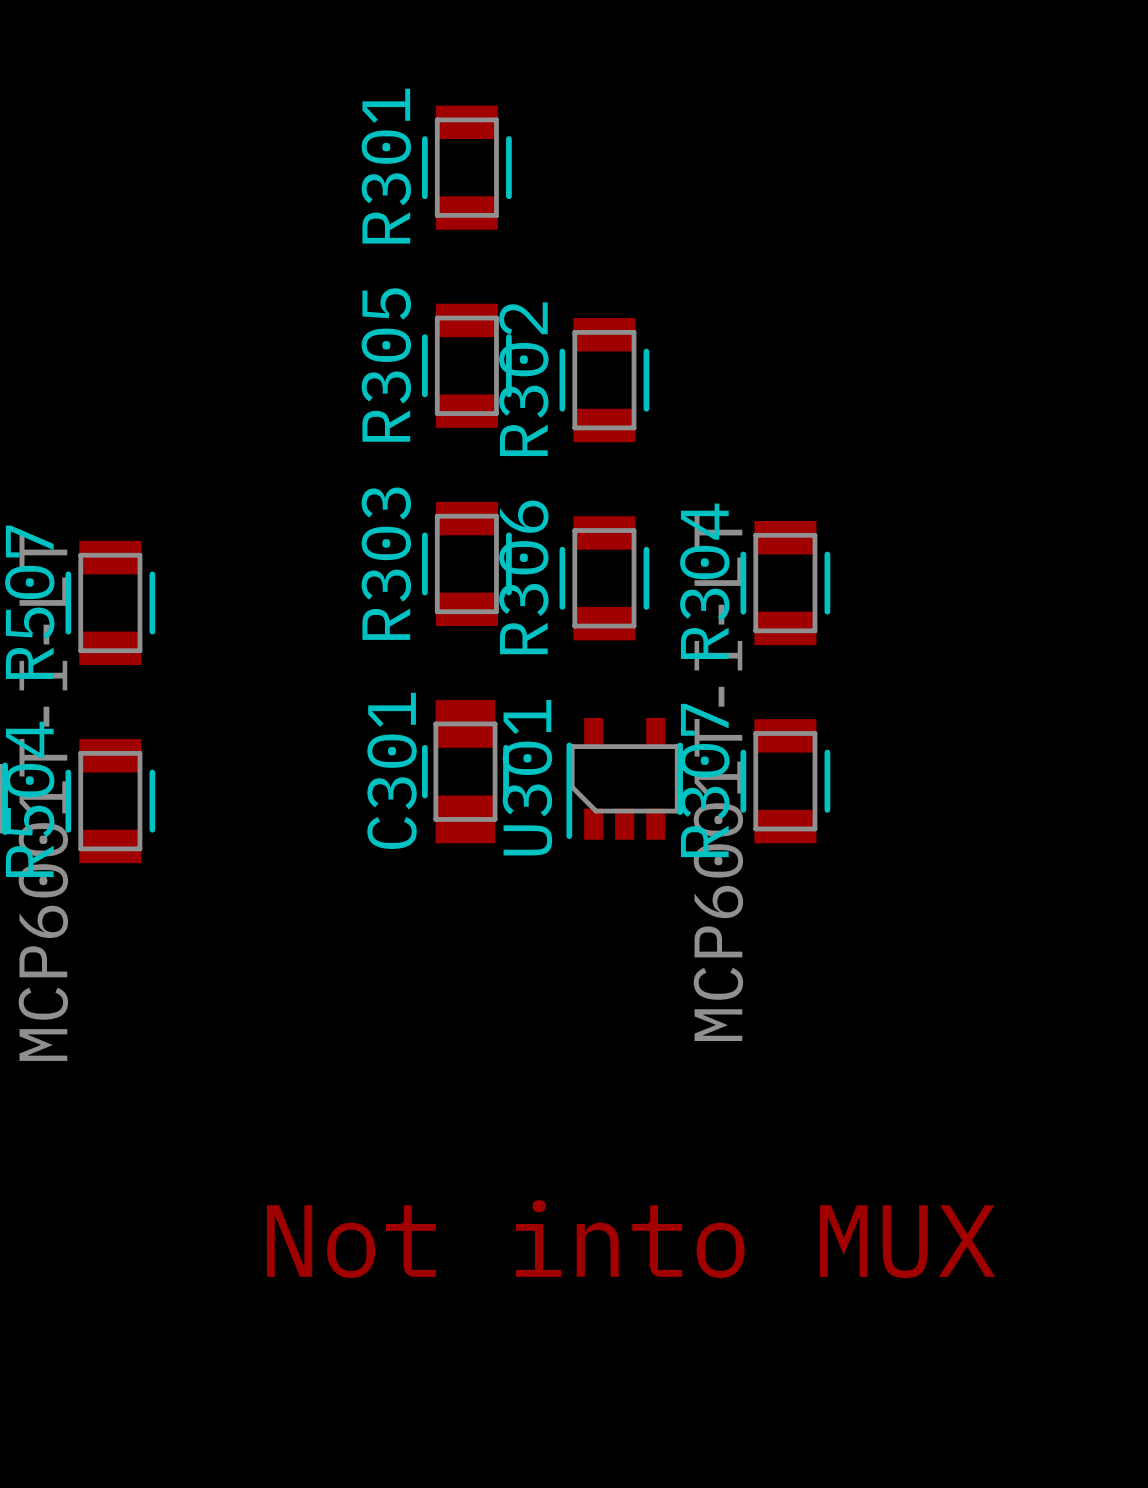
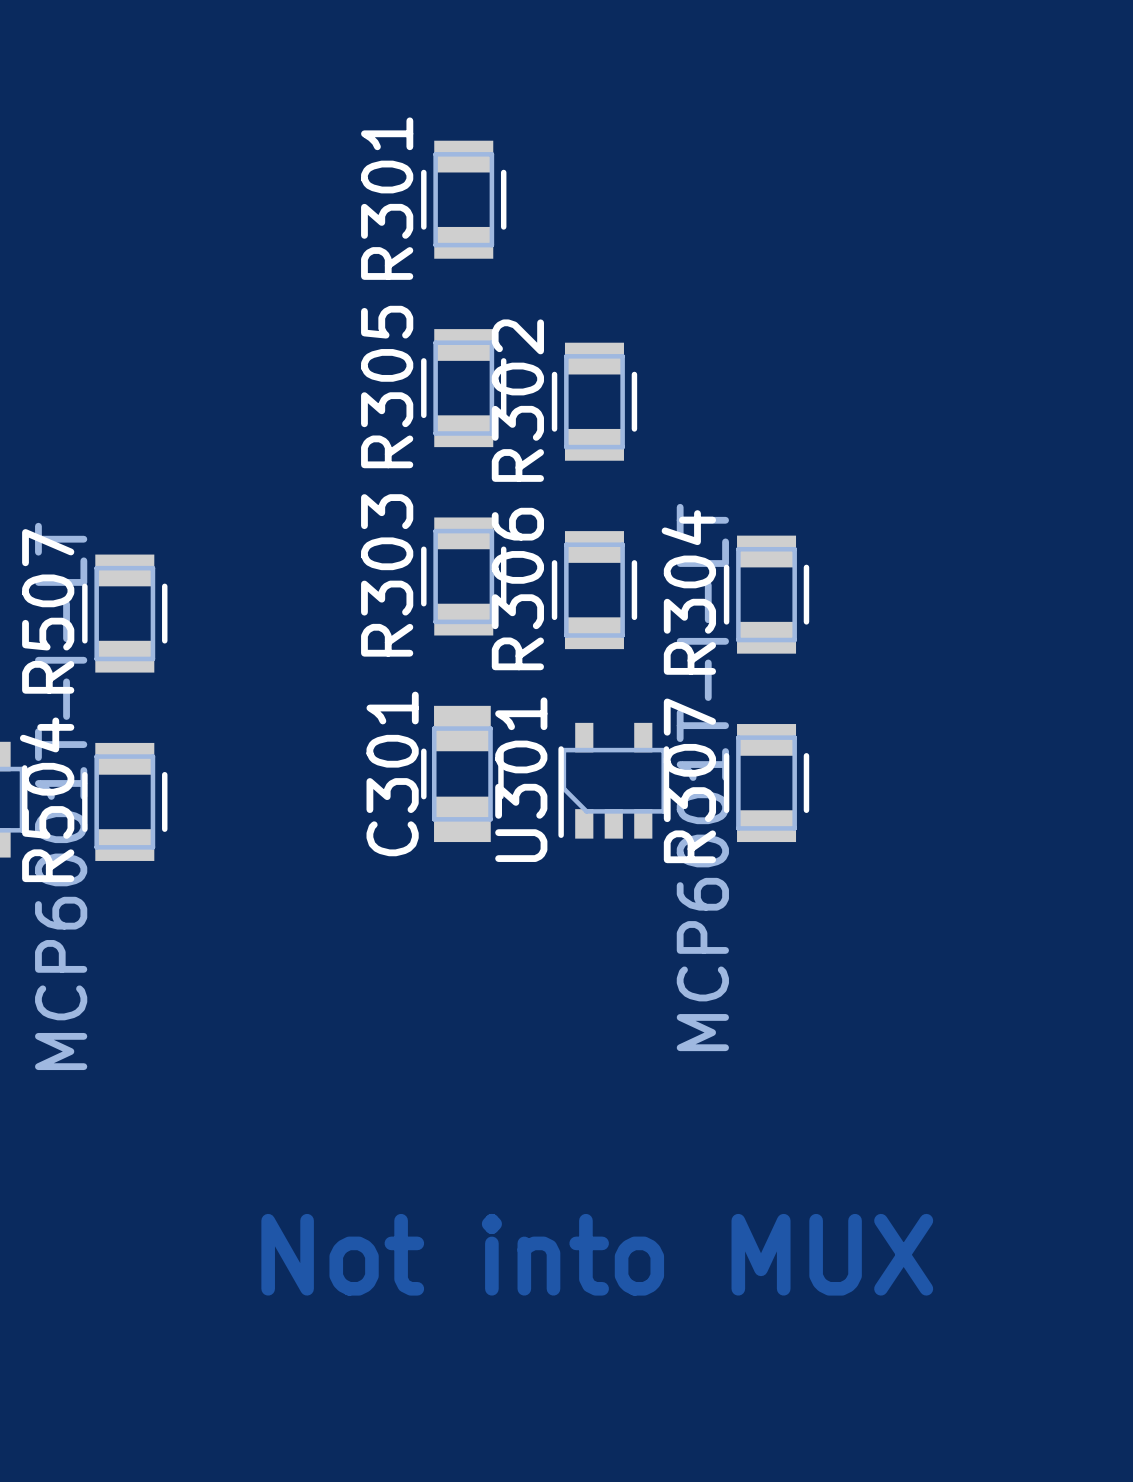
text position: Not into MUX (631, 1239) -> Not into MUX (597, 1254)

